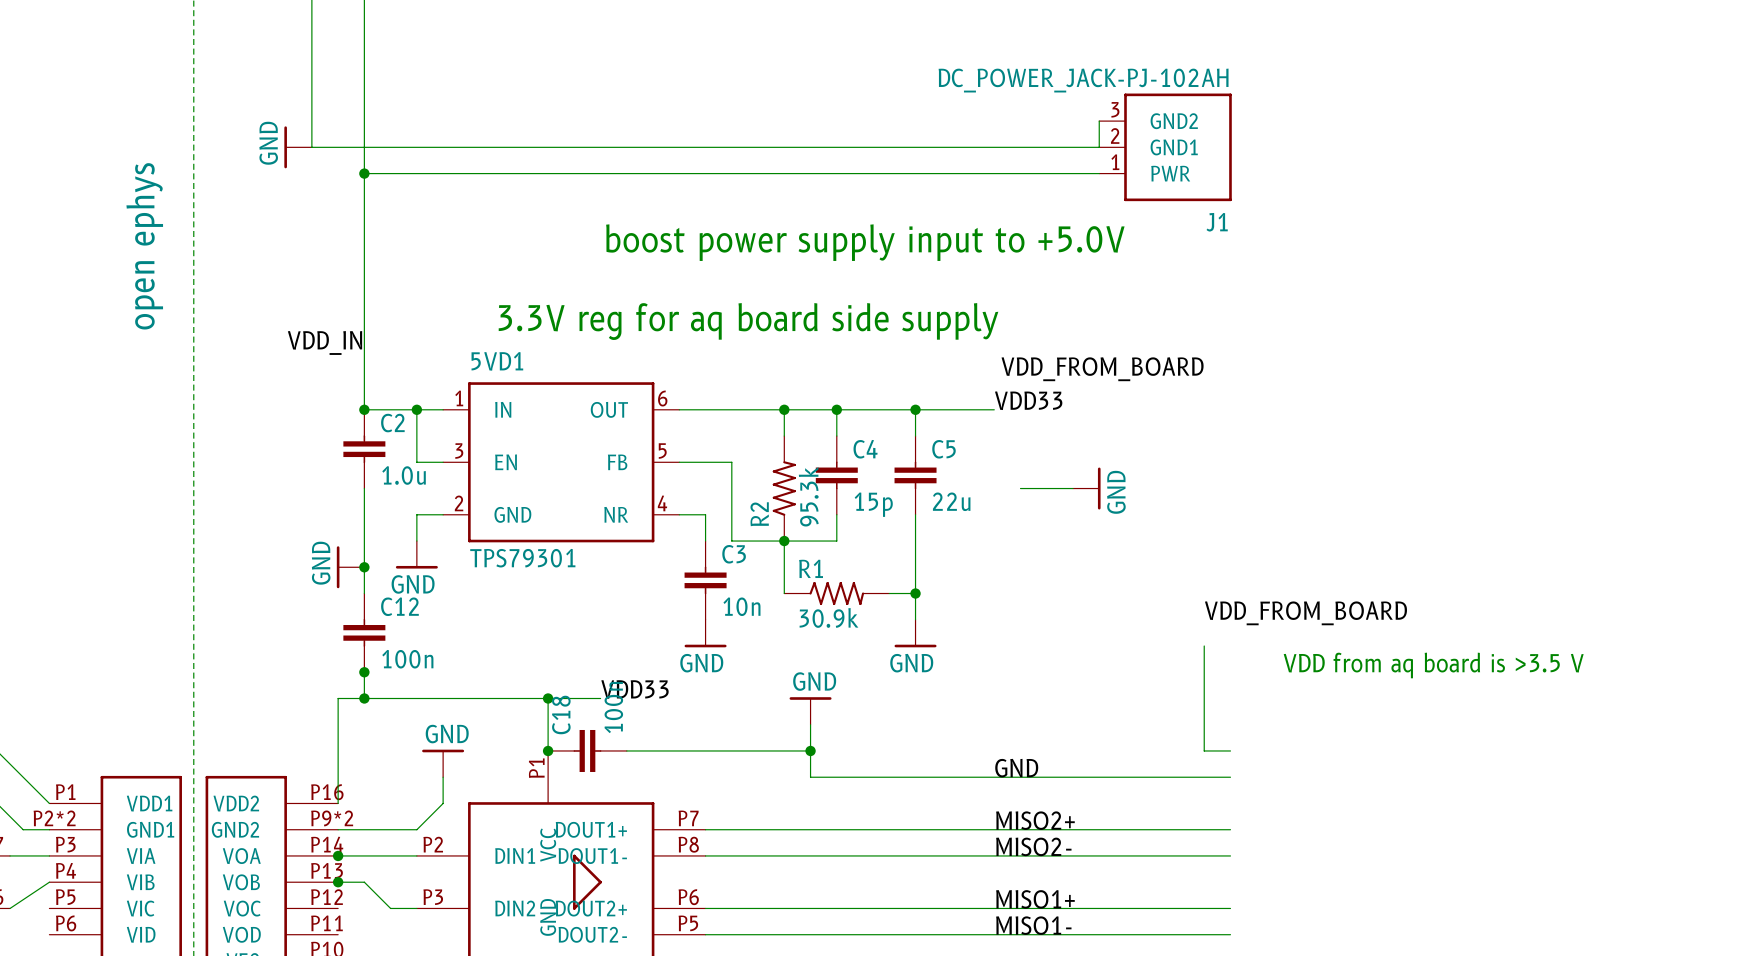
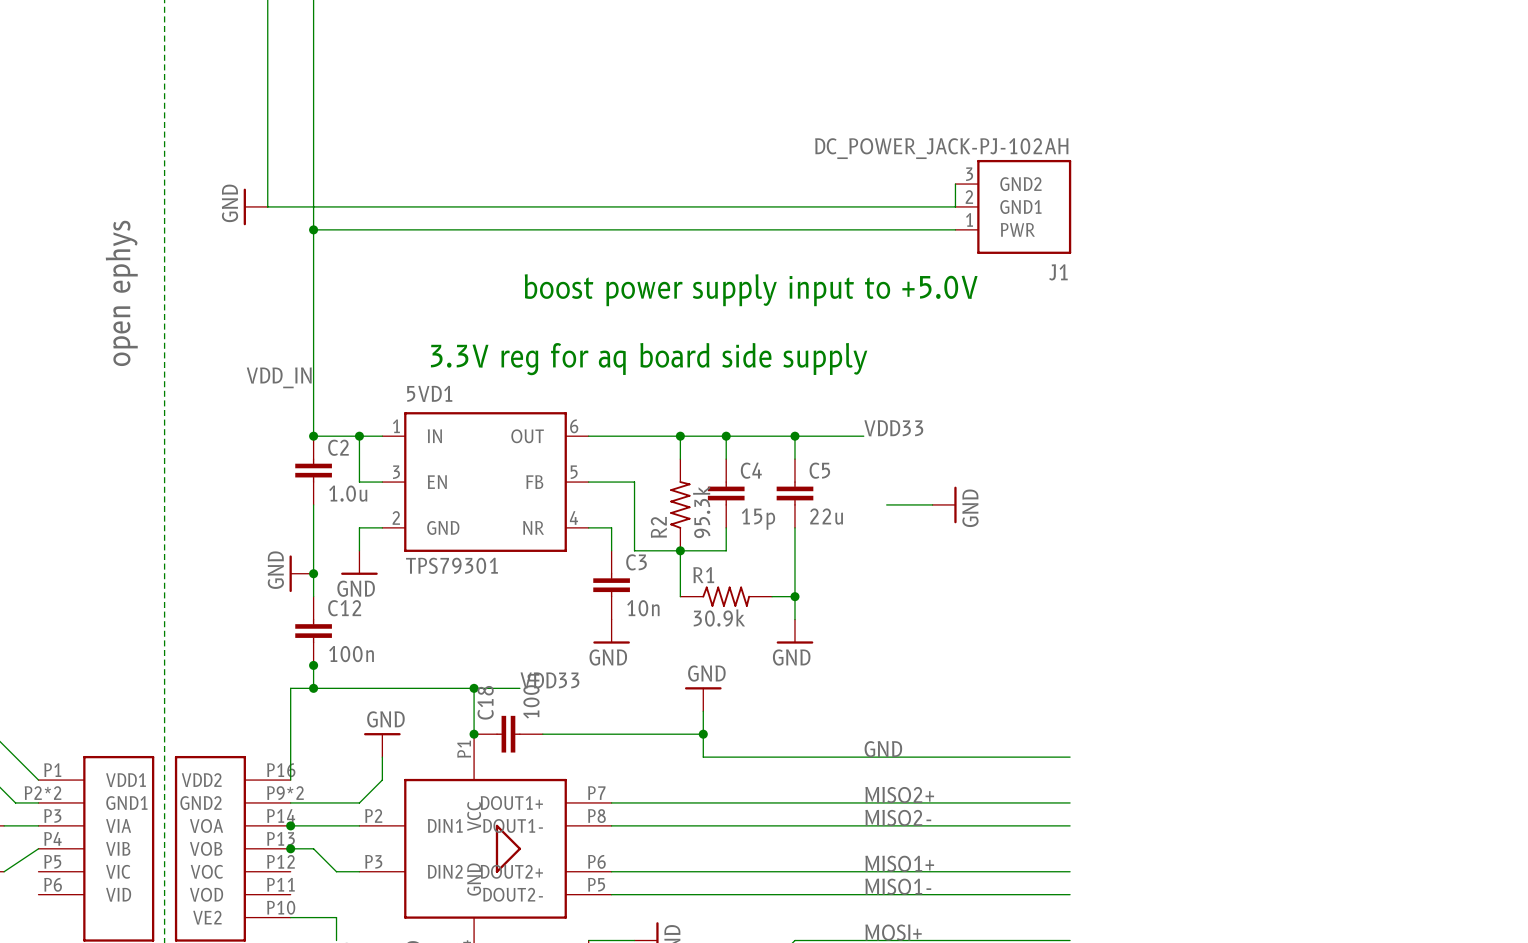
label: VDD_FROM_BOARD (1102, 369) -> none
label: VDD_FROM_BOARD (1305, 613) -> none
wire: (1204, 646) (1204, 750) (1230, 750) -> none
text: VDD from aq board is >3.5 V (1433, 665) -> none

